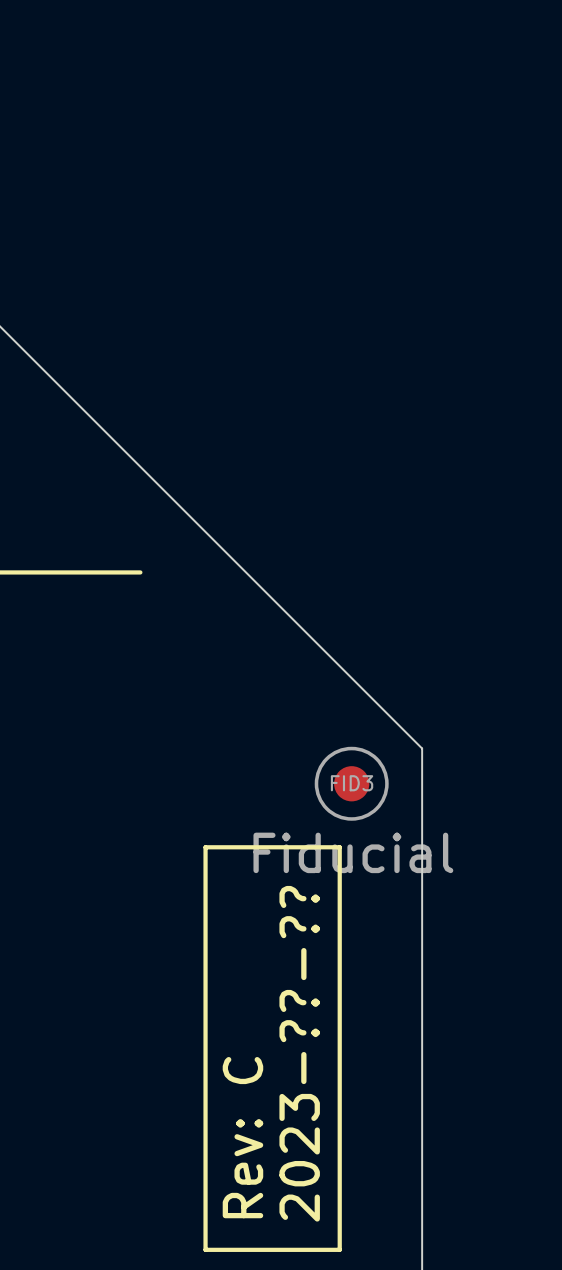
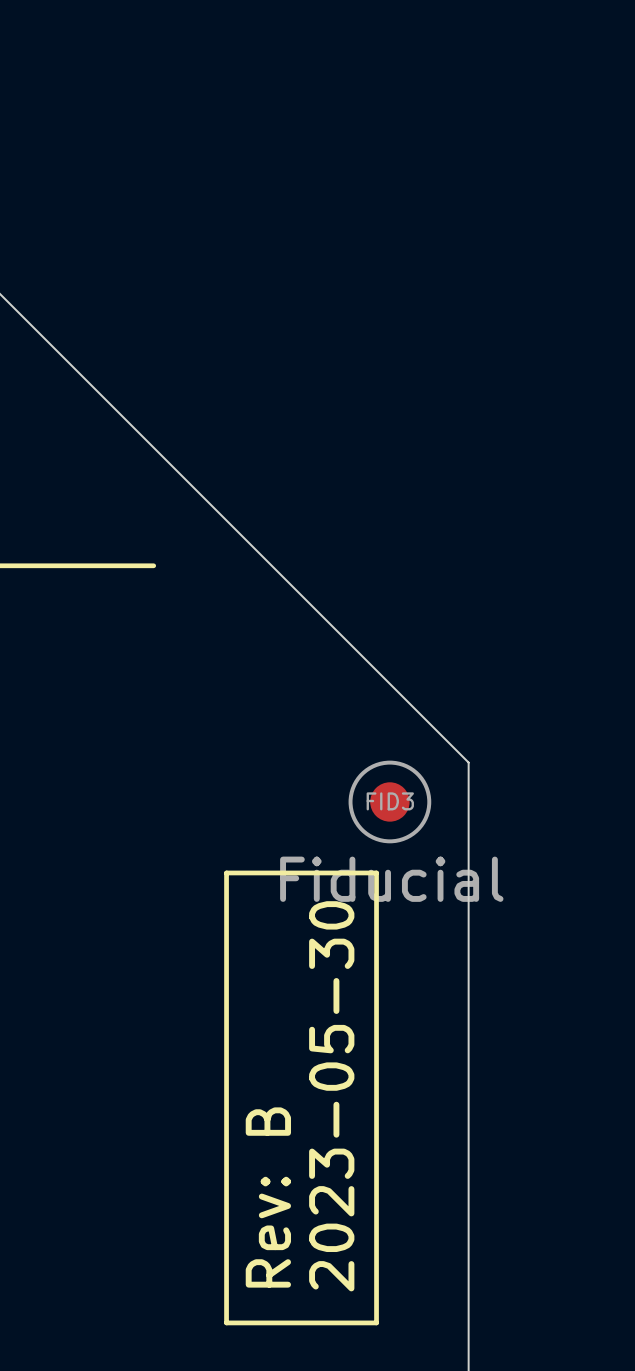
text: 2023-??-?? (299, 1053) -> 2023-05-30 (331, 1096)
text: Rev: C (242, 1137) -> Rev: B (268, 1197)

